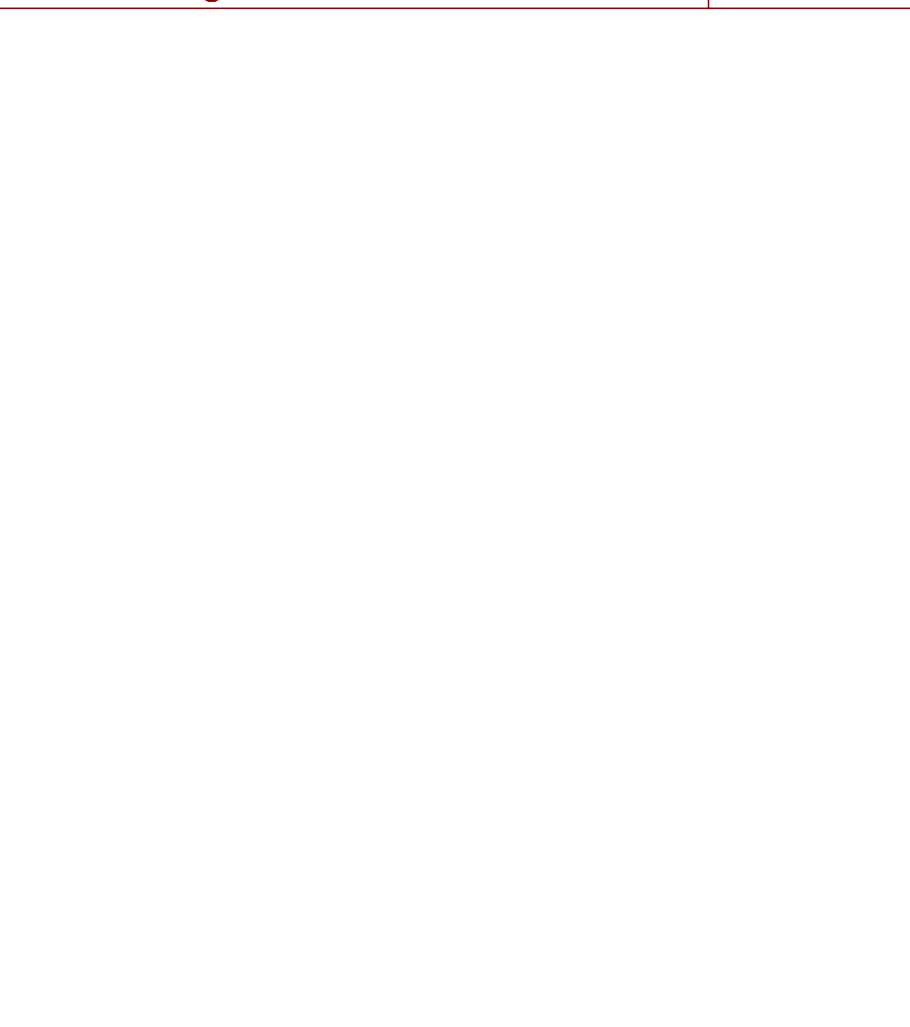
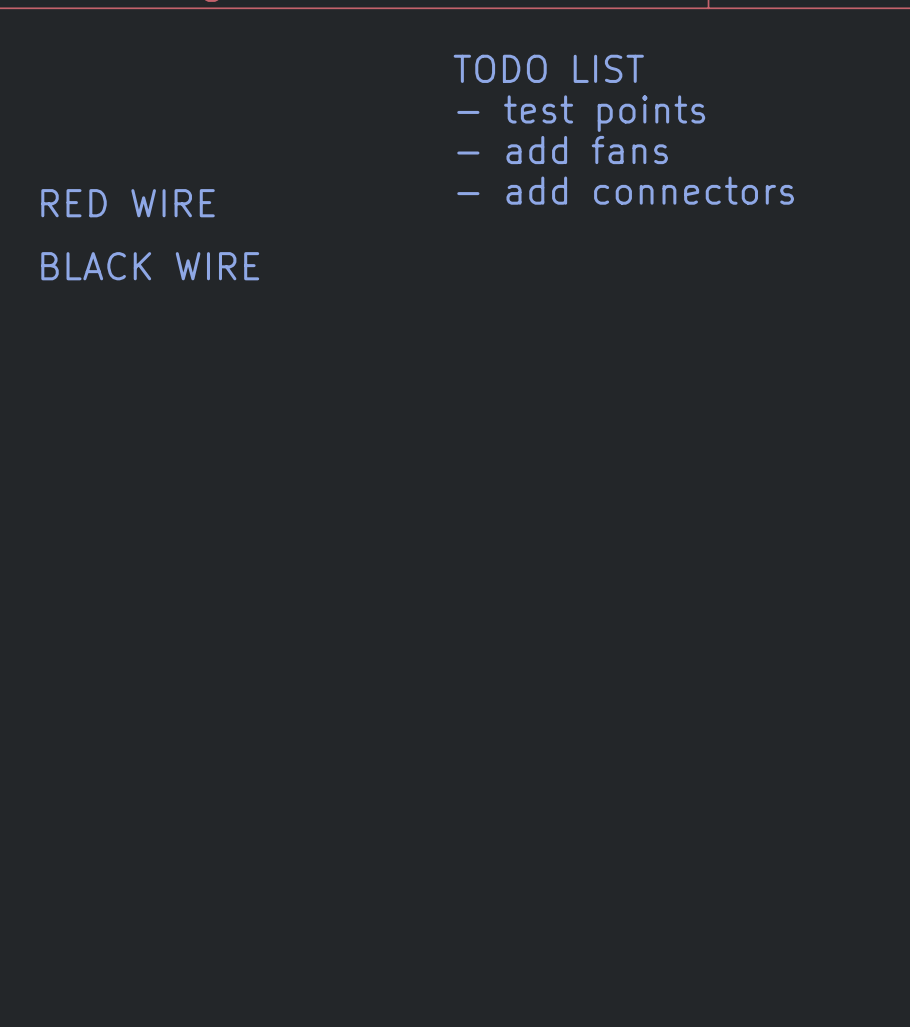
text: none -> TODO LIST (548, 68)
text: none -> - test points (581, 113)
text: none -> - add fans (562, 150)
text: none -> - add connectors (625, 190)
text: none -> RED WIRE (128, 203)
text: none -> BLACK WIRE (150, 266)

